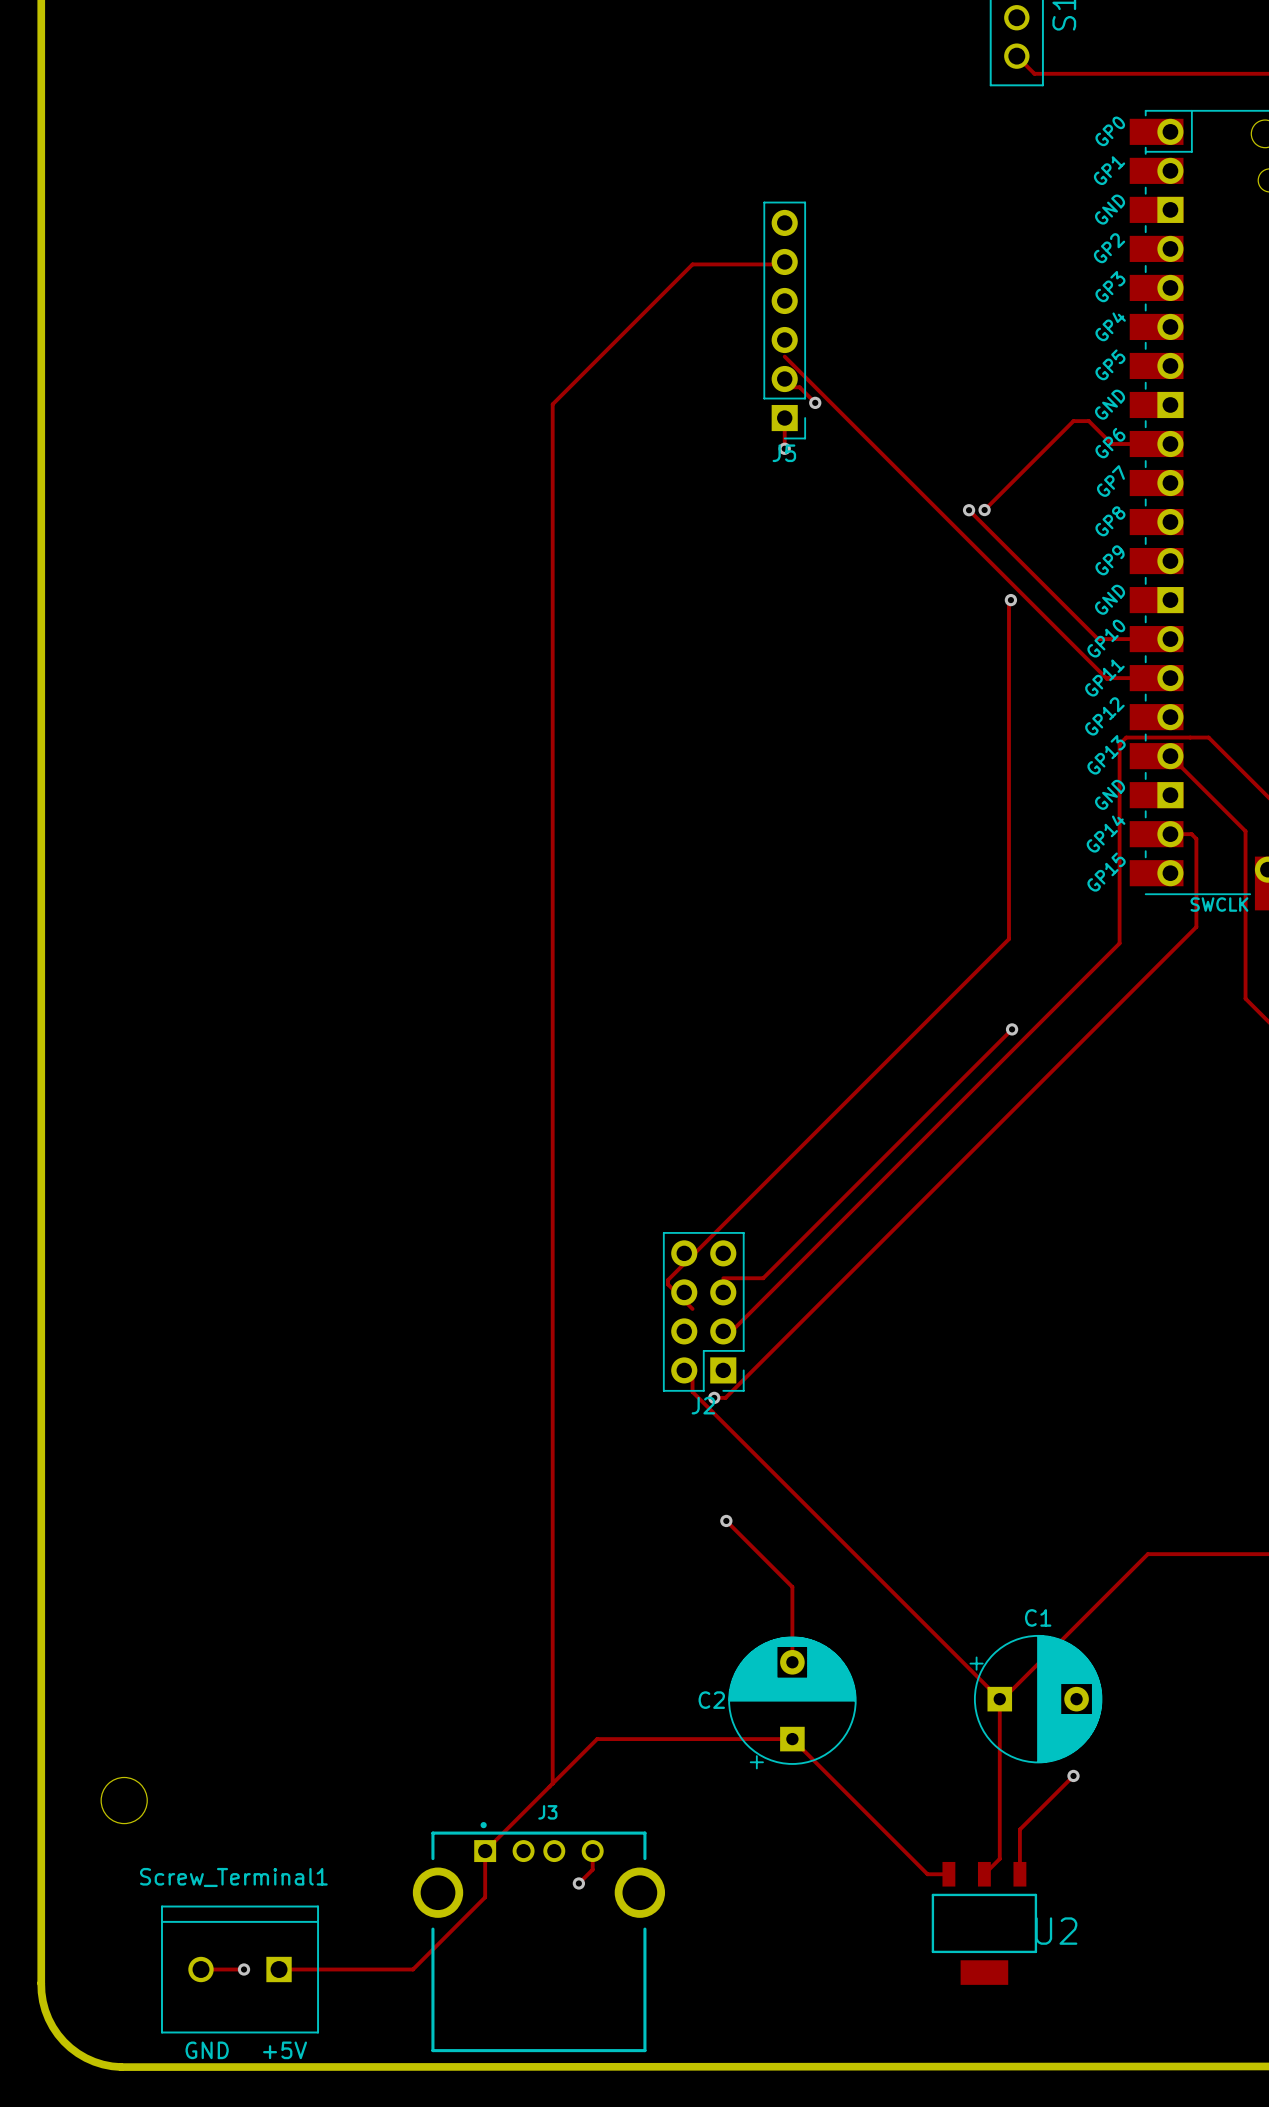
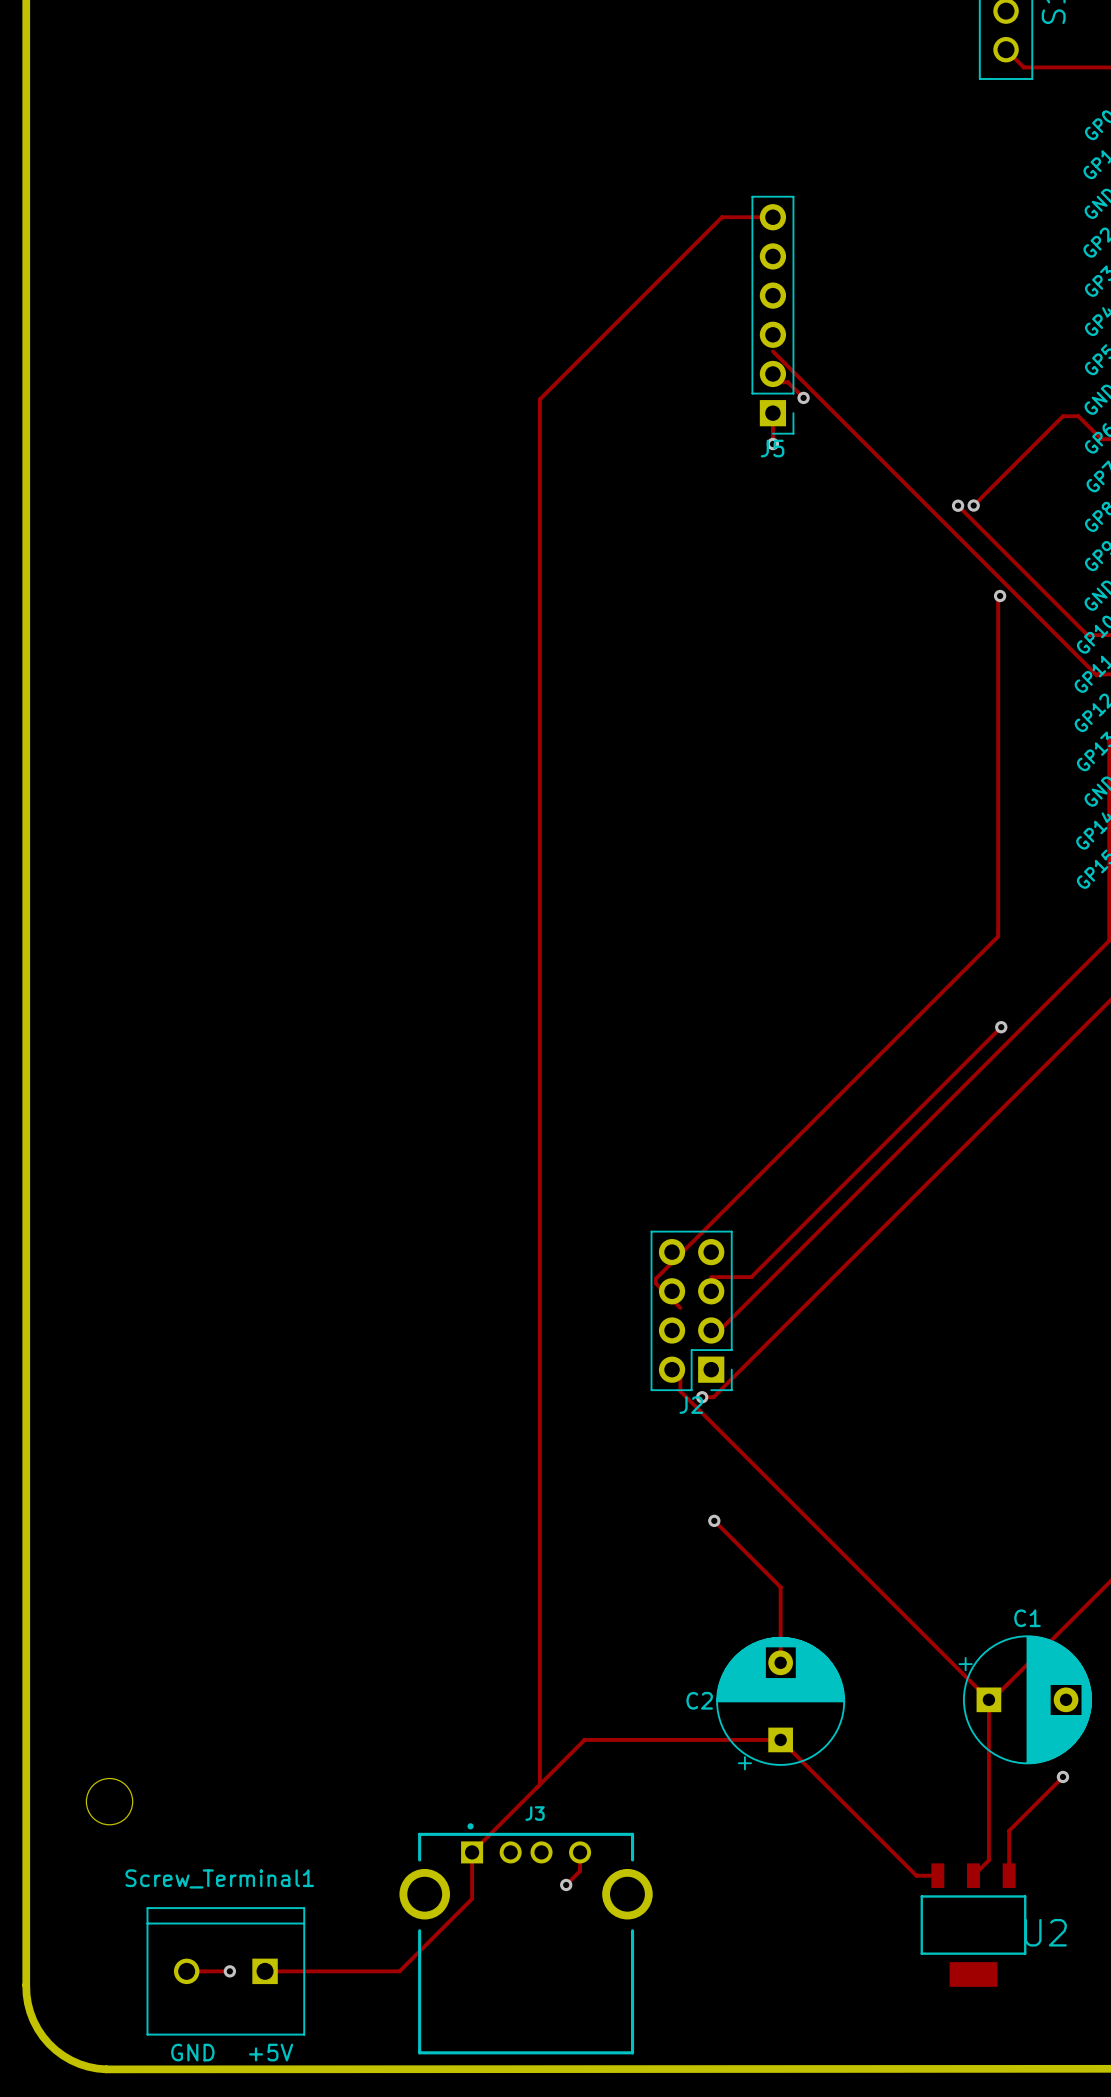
track: (692, 264) (784, 264) -> (680, 258) (722, 217) (772, 217)

